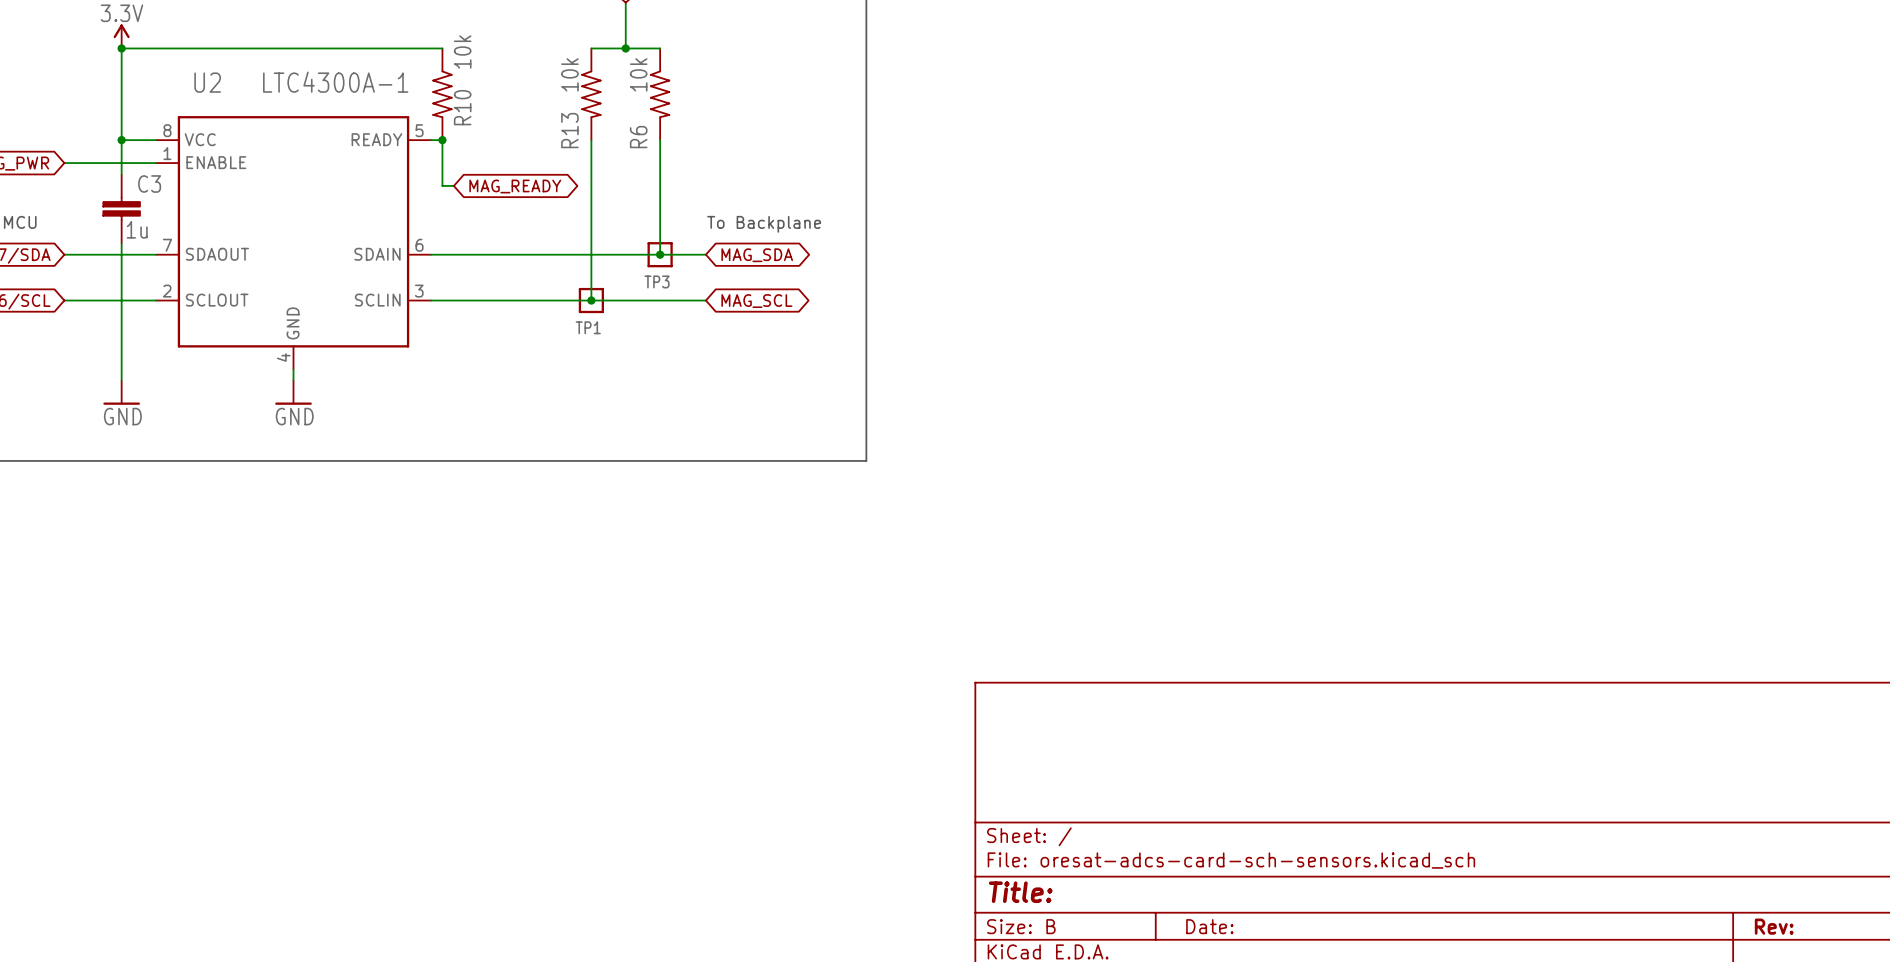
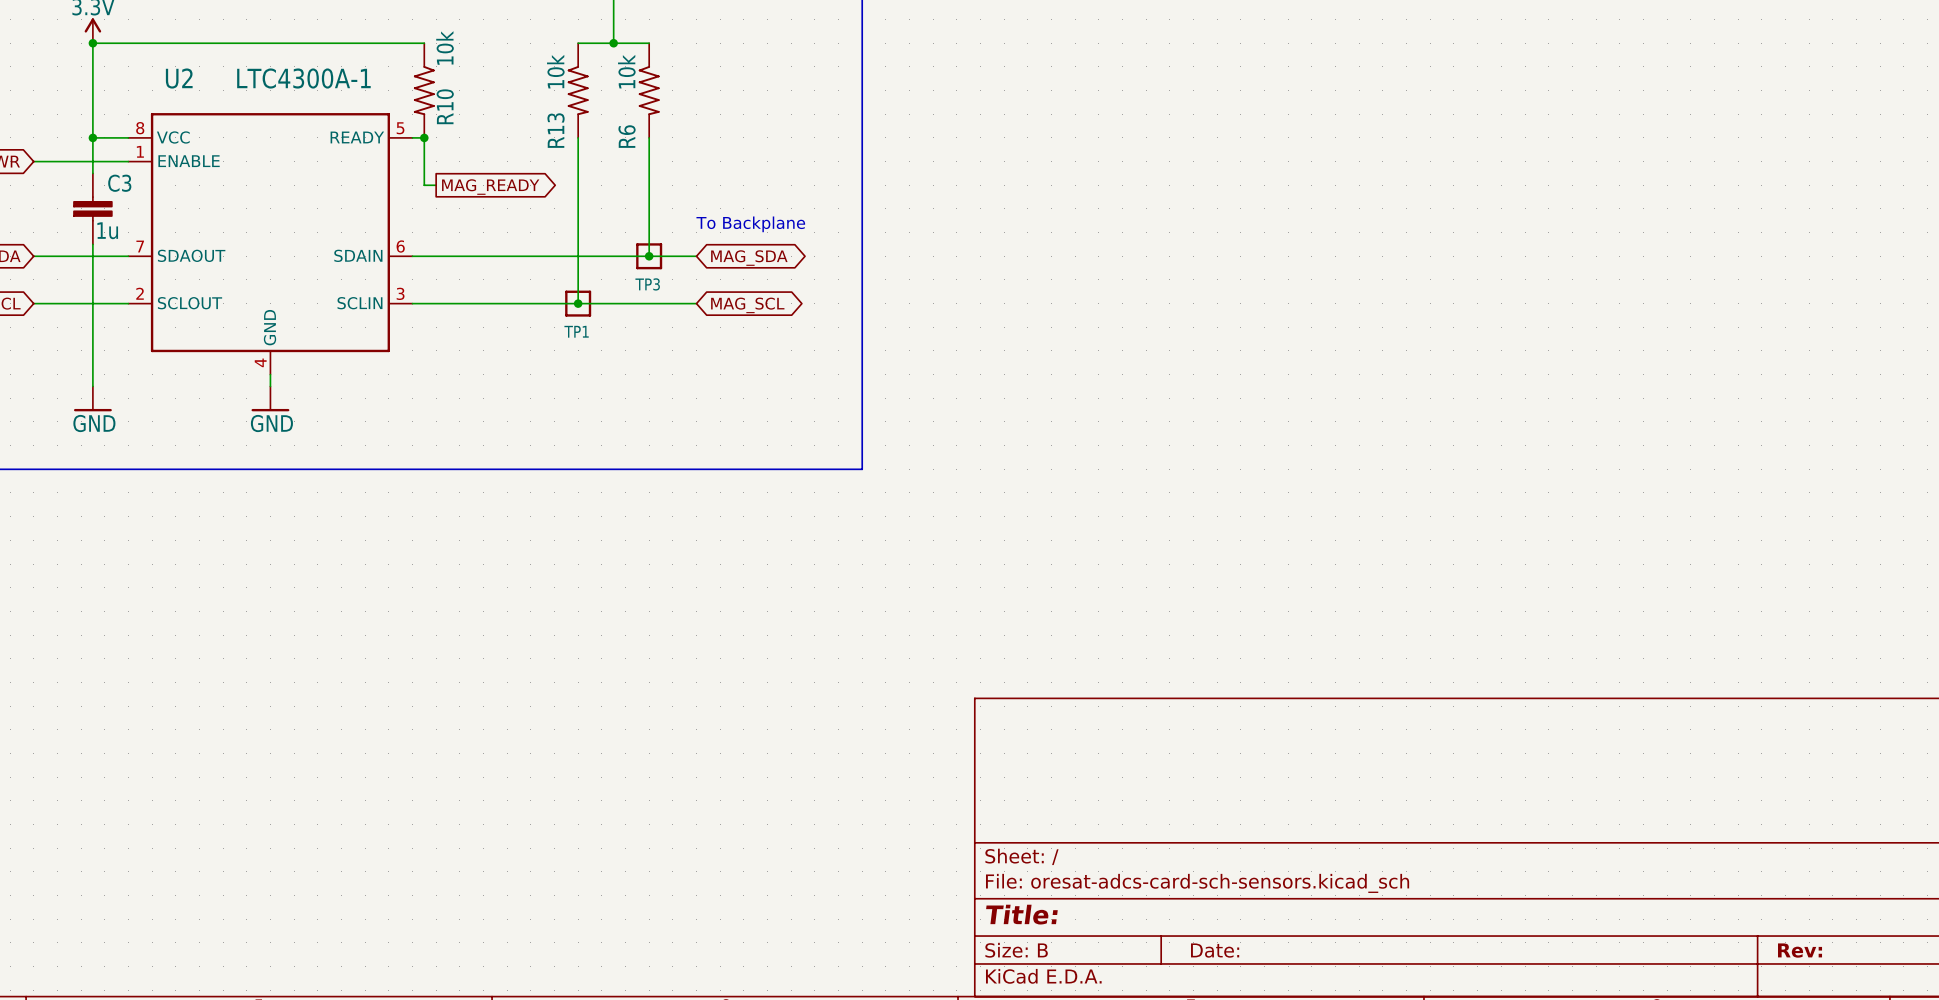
global label shape: bidirectional (515, 186) -> output (490, 187)

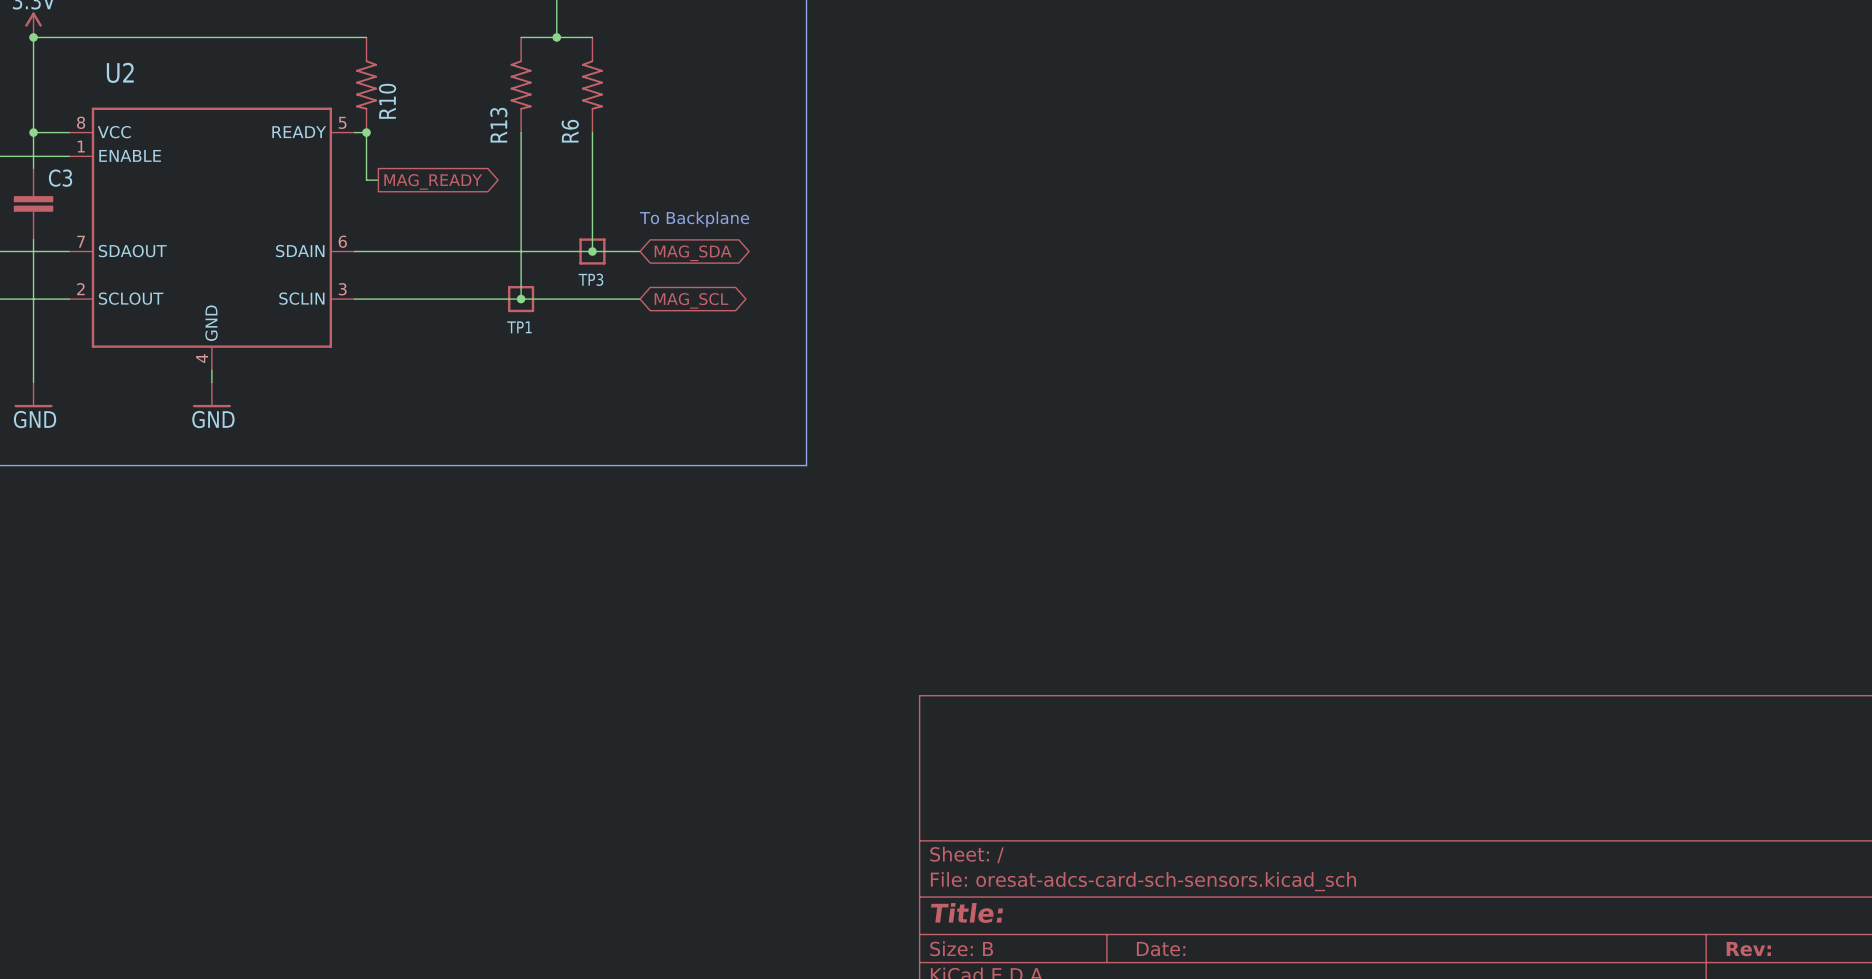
R10 value: 10k (445, 47) -> none
R13 value: 10k (555, 71) -> none
R6 value: 10k (626, 71) -> none
U2 value: LTC4300A-1 (303, 78) -> none
C3 value: 1u (107, 230) -> none

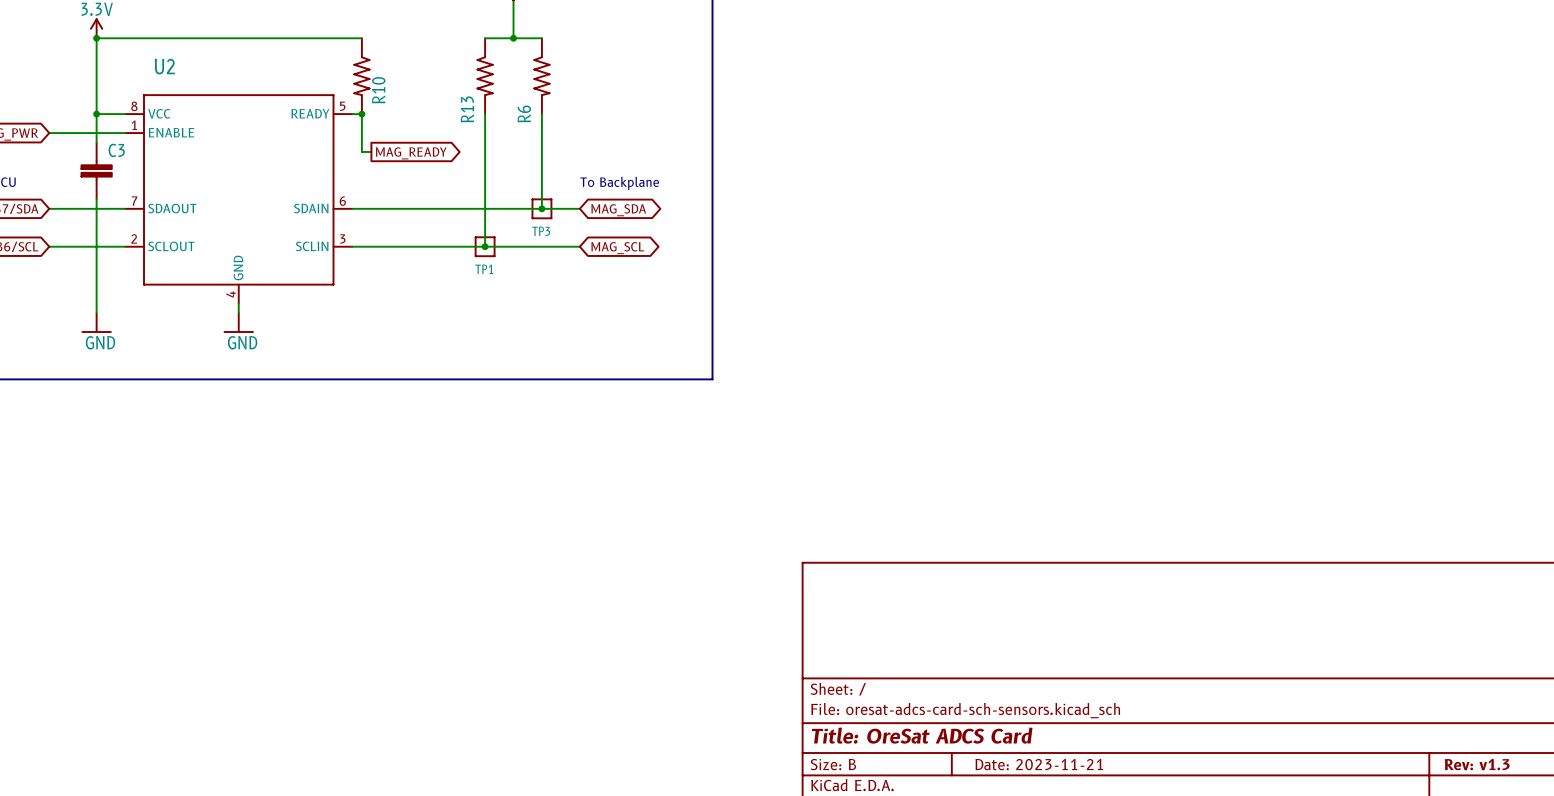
title block: Title: (966, 912) -> Title: OreSat ADCS Card (922, 735)
title block: Date: (1161, 949) -> Date: 2023-11-21 (1039, 764)
title block: Rev: (1748, 949) -> Rev: v1.3 (1477, 764)

